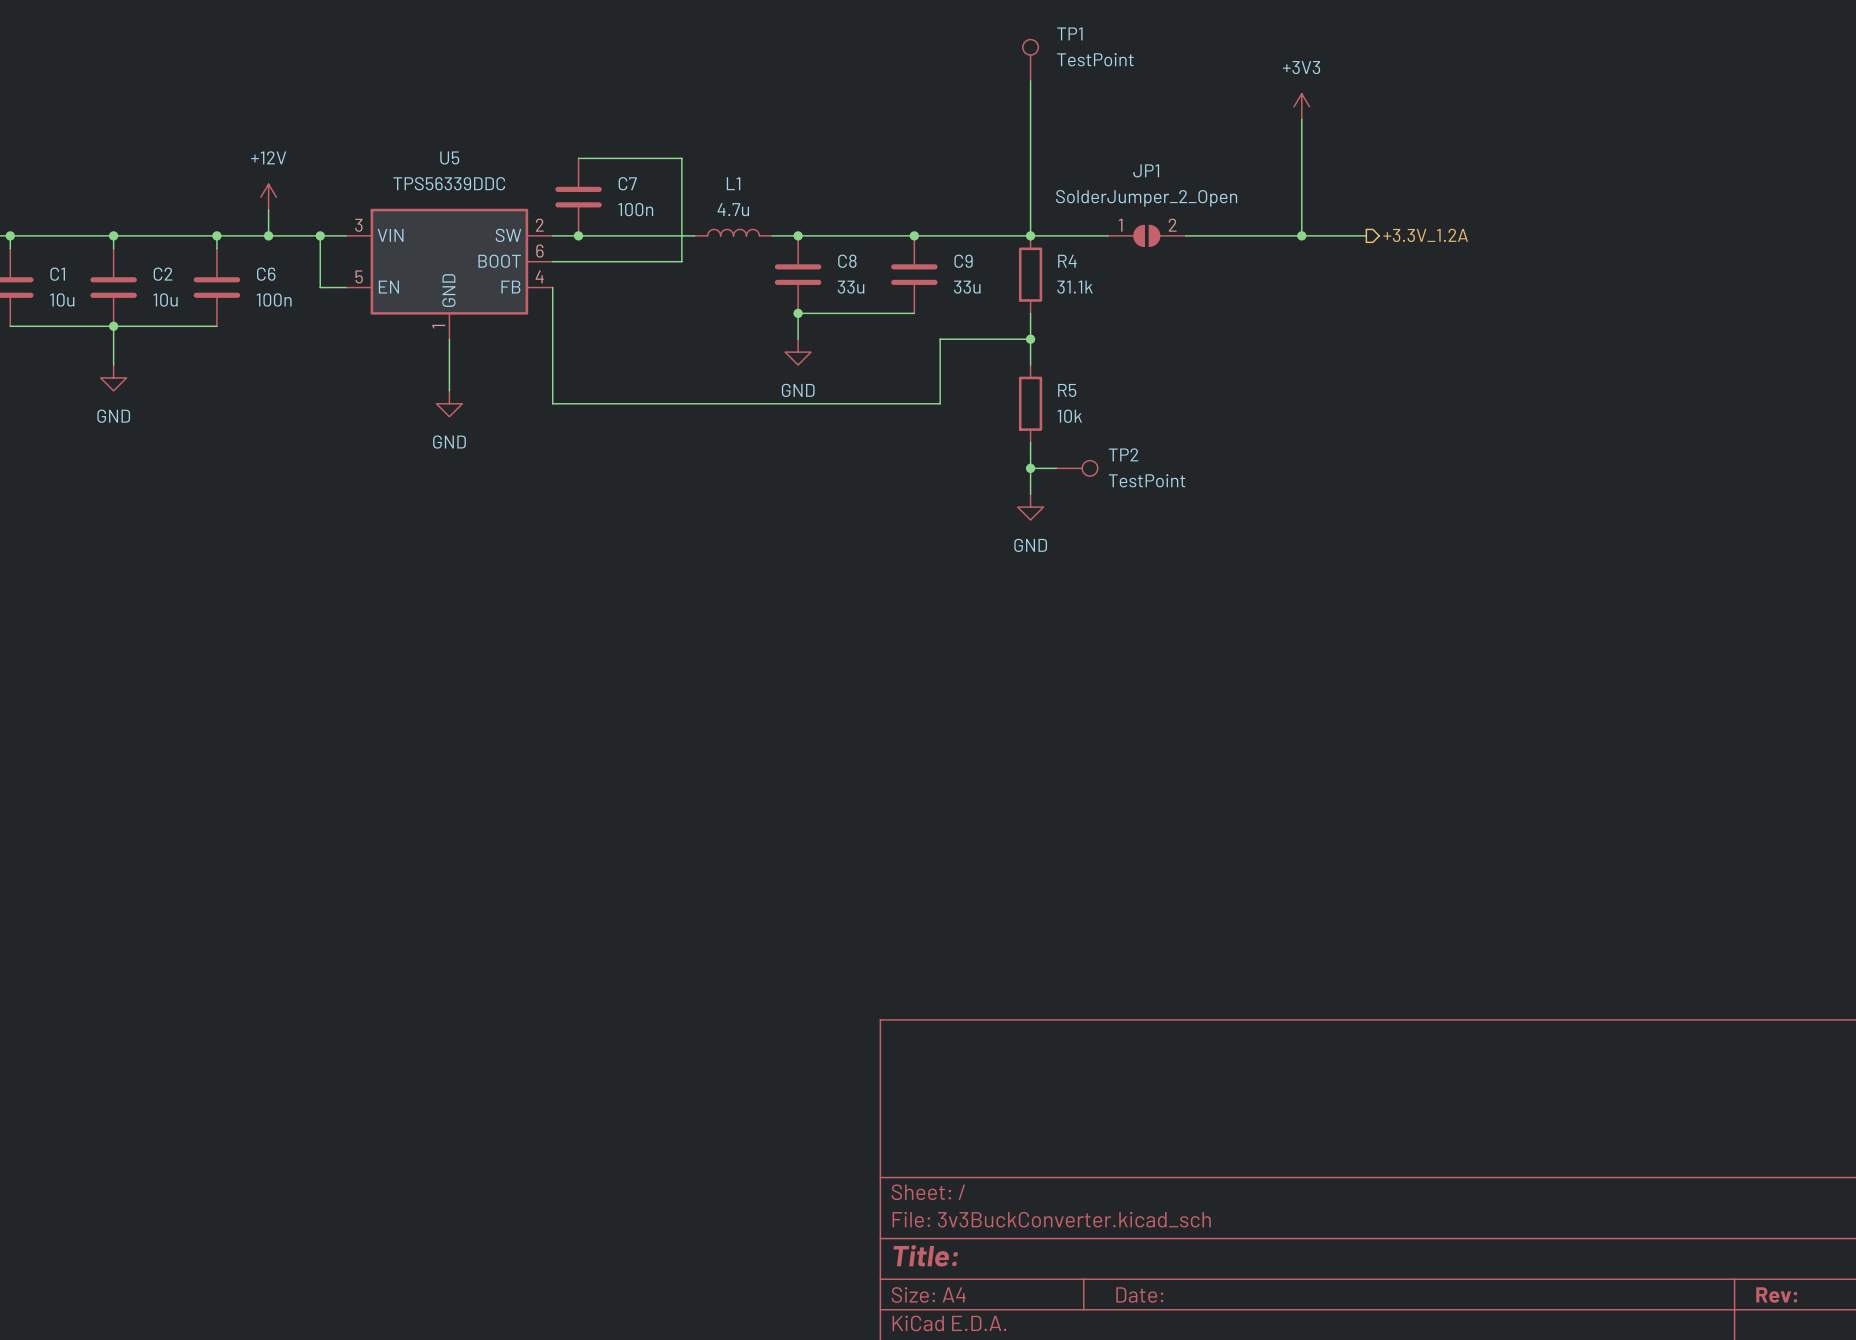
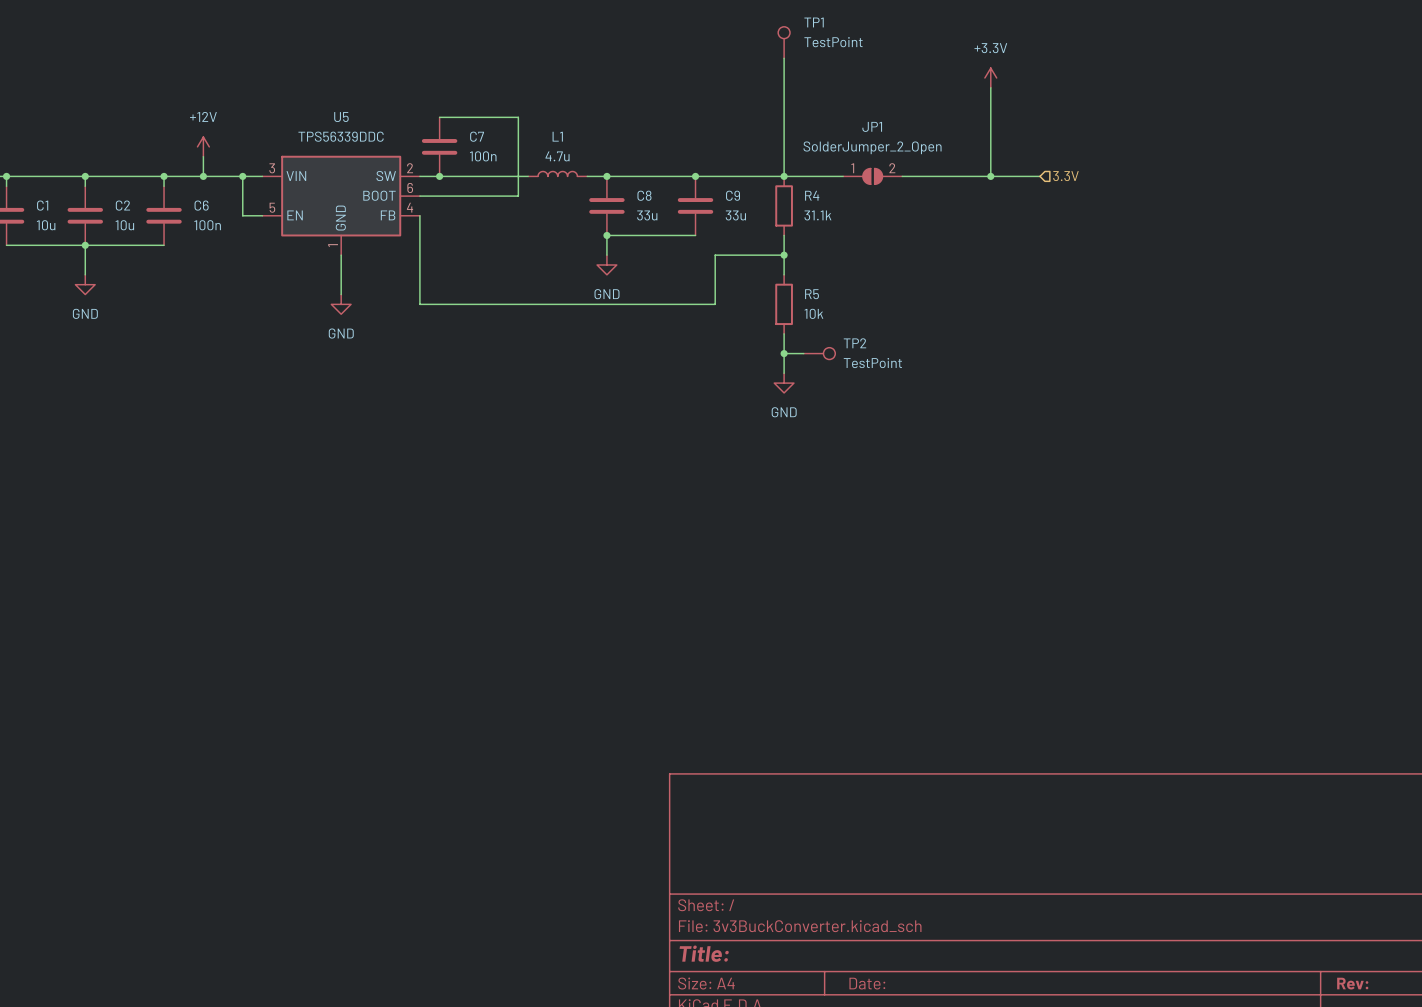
power symbol: +3V3 (1301, 106) -> +3.3V (990, 77)
hierarchical label shape: output (1425, 235) -> input (1065, 176)
hierarchical label: +3.3V_1.2A (1425, 235) -> 3.3V (1065, 176)

